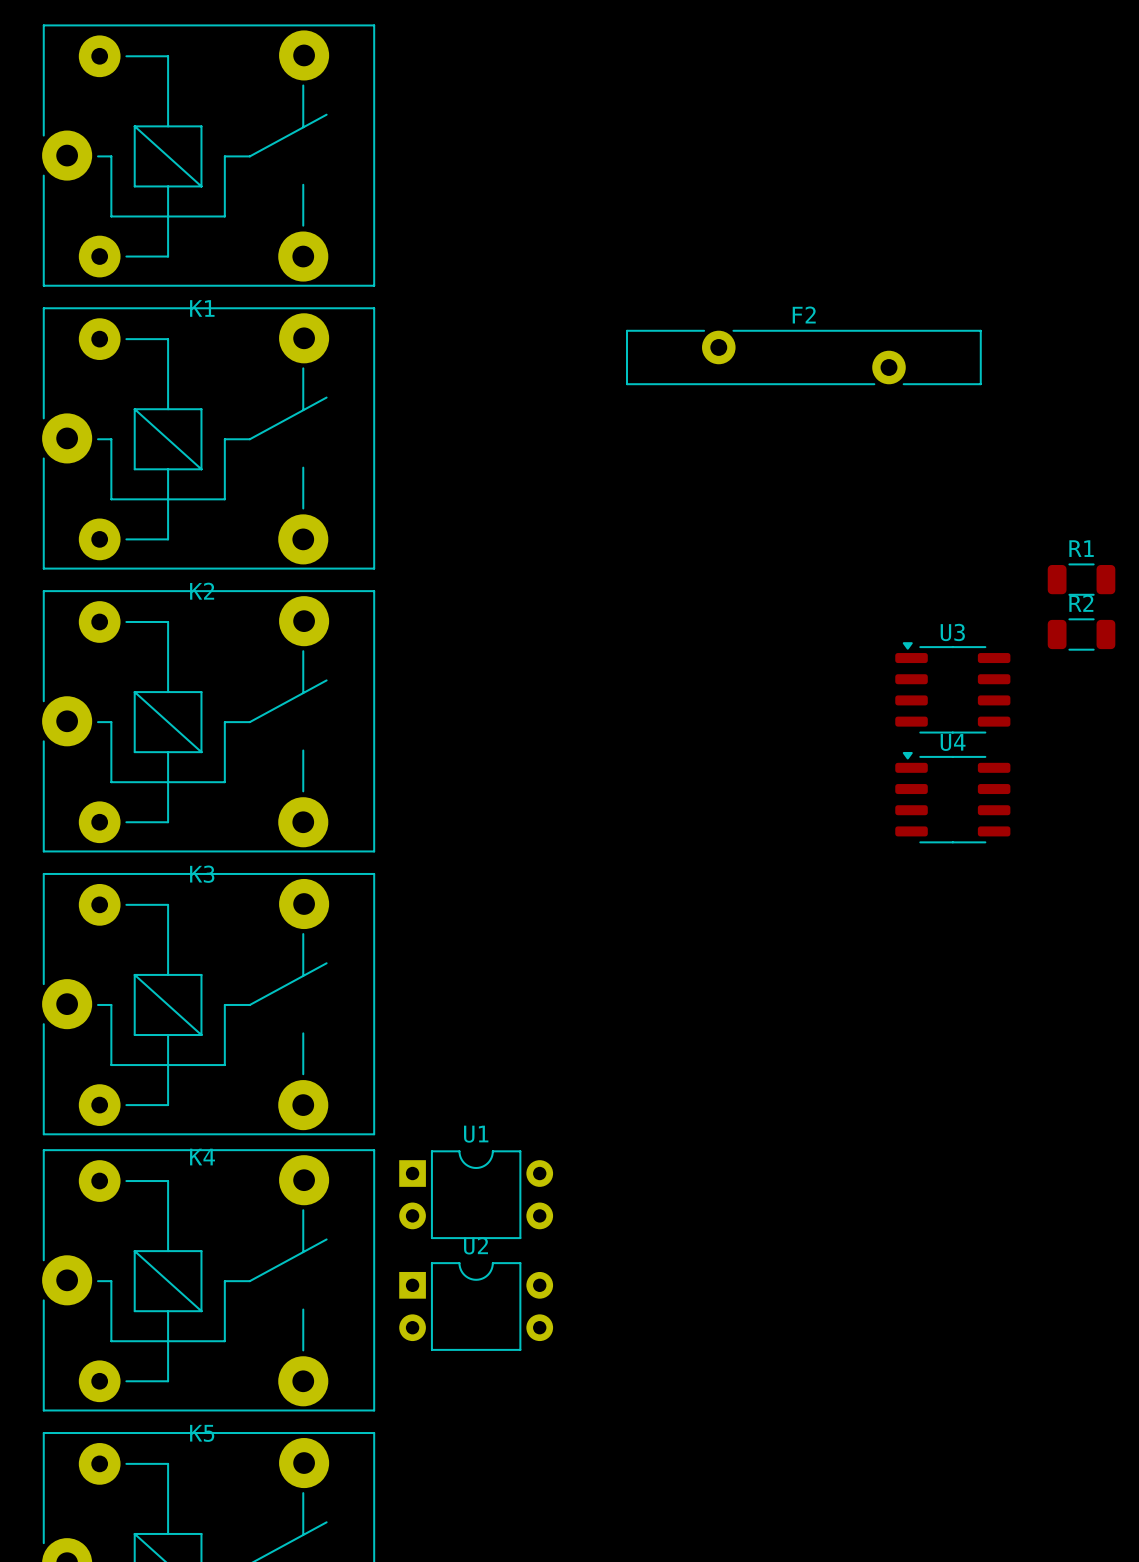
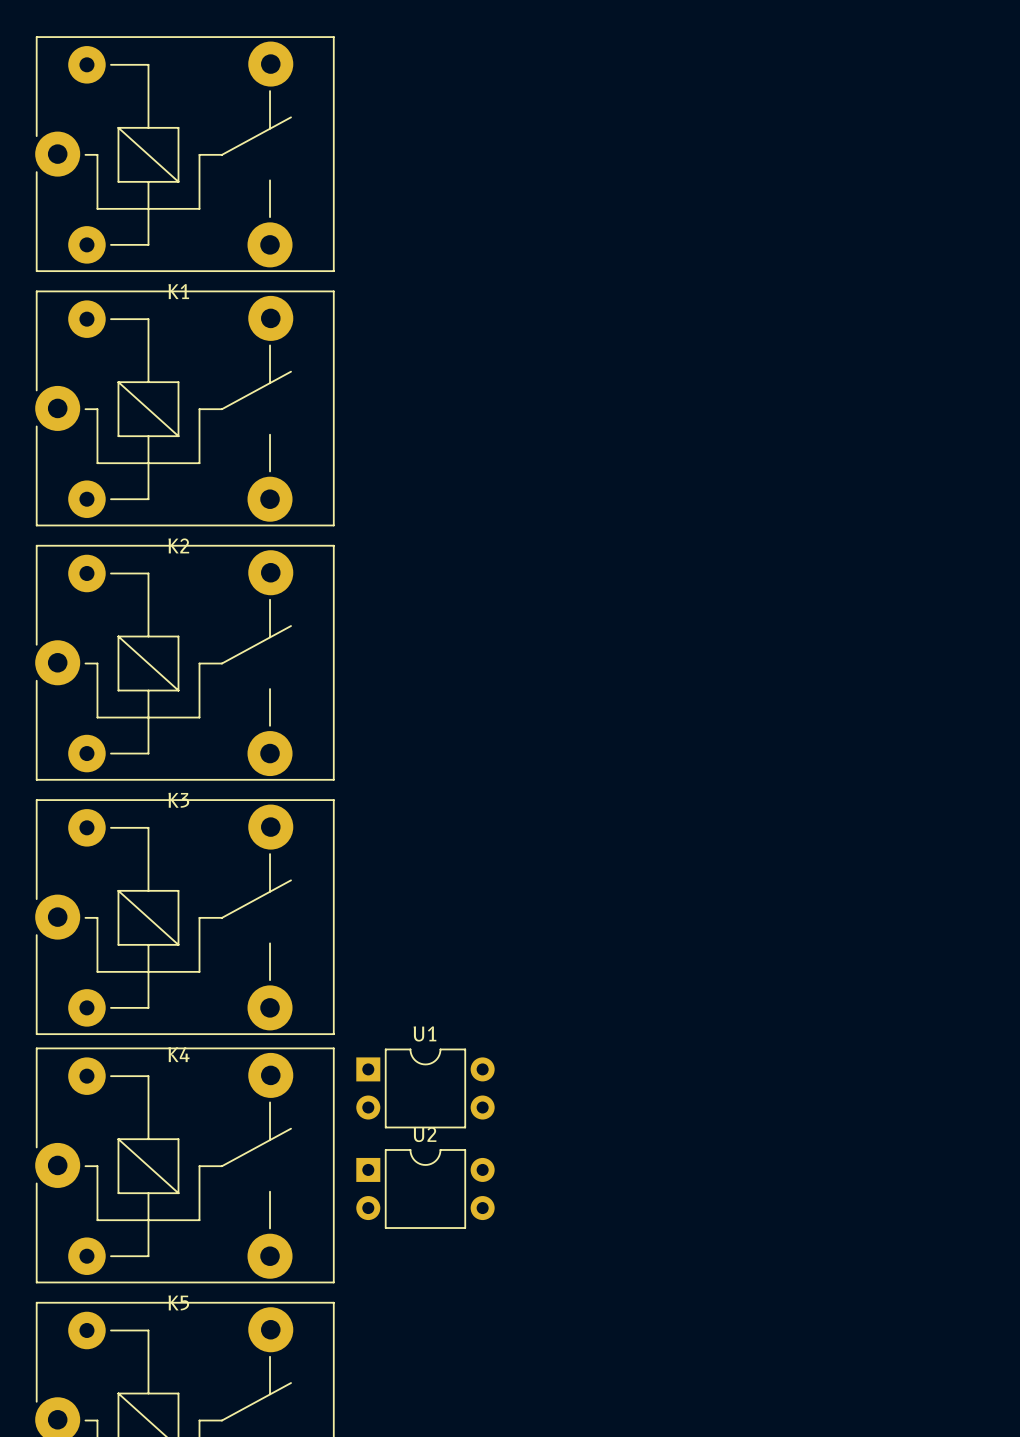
F2: (803, 357) -> none
R1: (1081, 579) -> none
R2: (1081, 634) -> none
U3: (952, 687) -> none
U4: (952, 797) -> none

